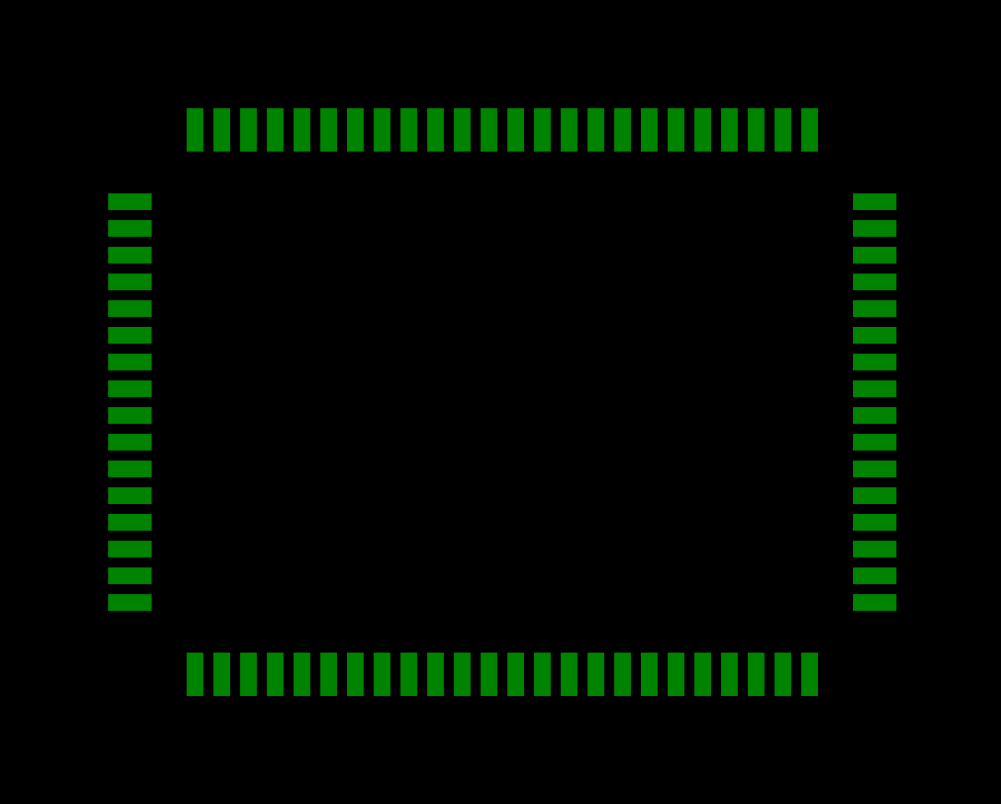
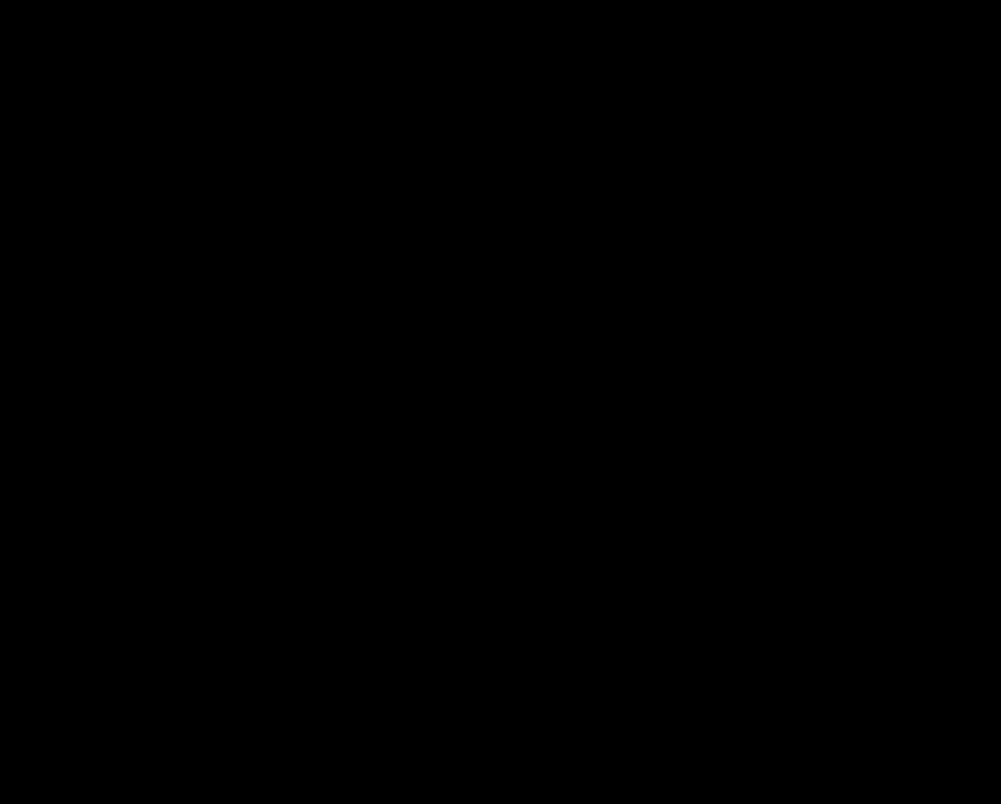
part: (502, 402) -> none

